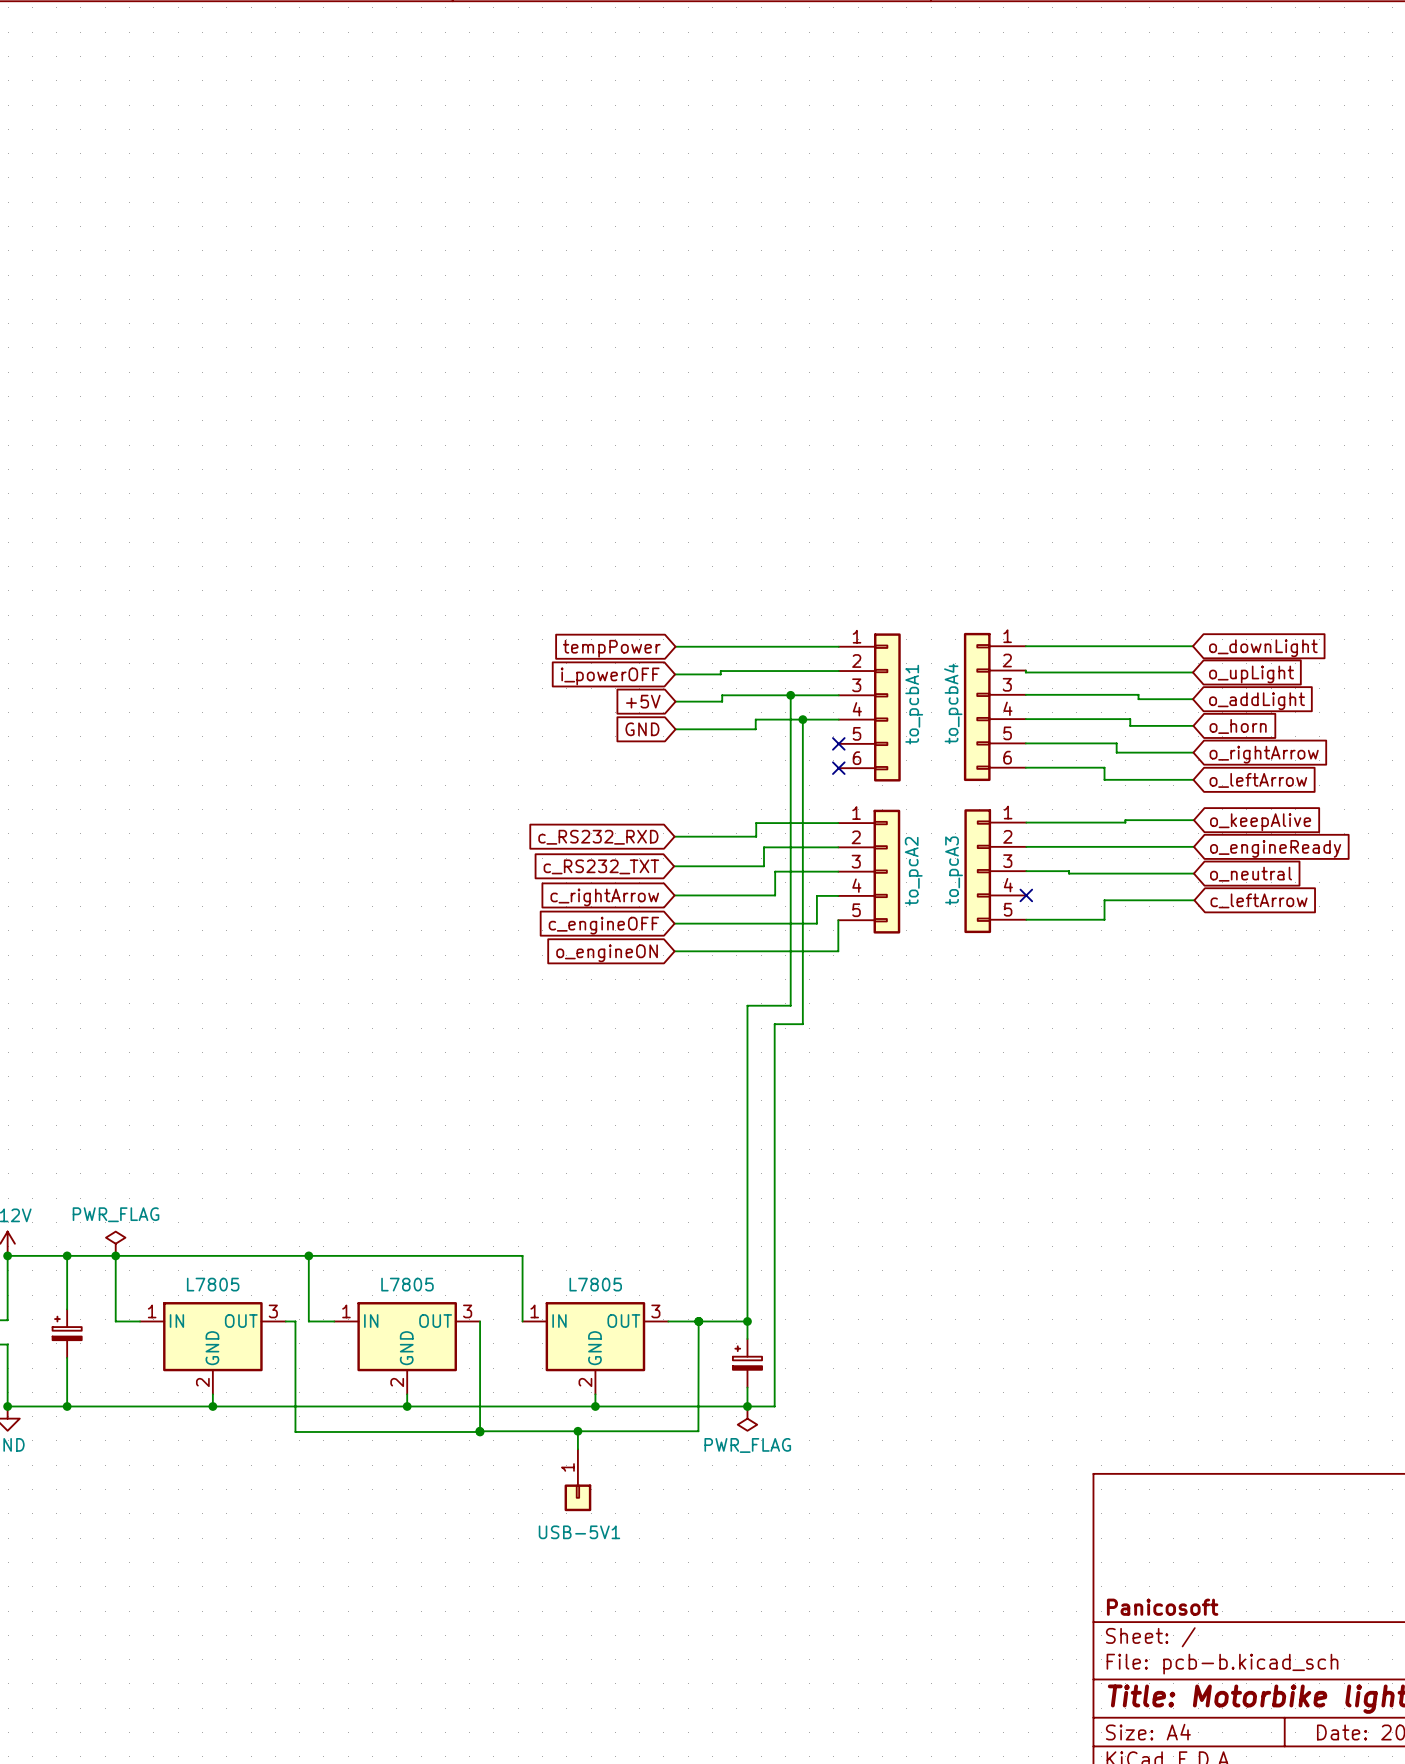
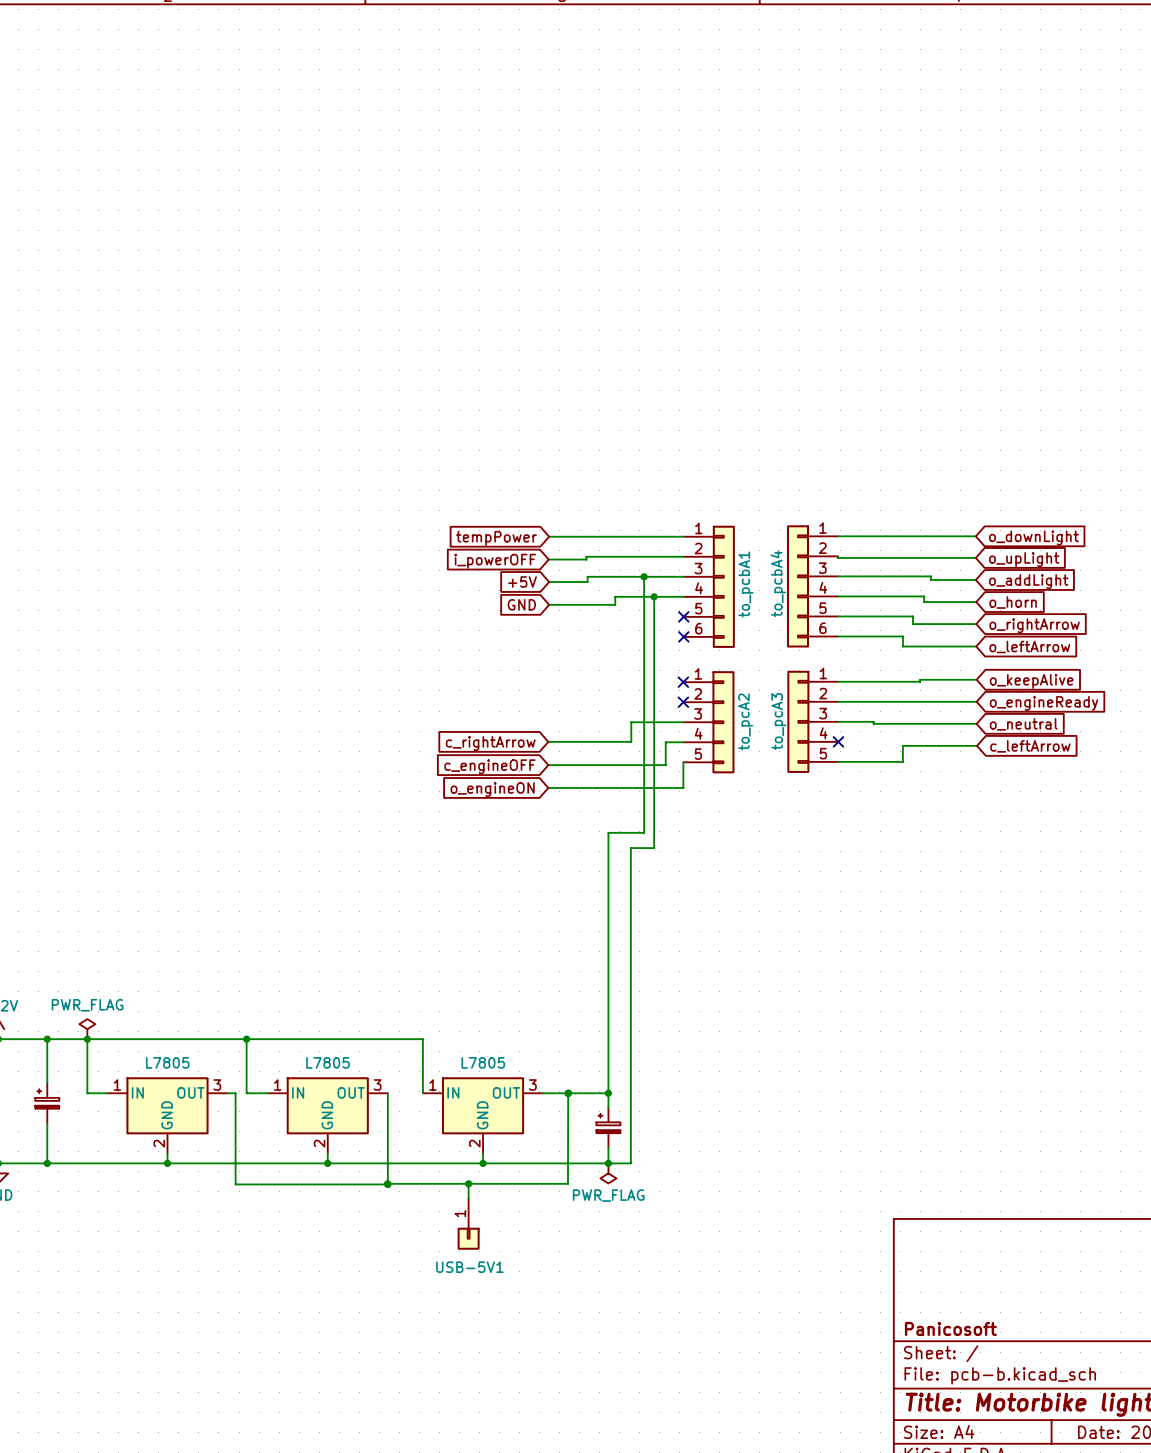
wire: (838, 823) (756, 823) (756, 836) (674, 836) -> none
no-connect mark: none -> (683, 682)
global label: c_RS232_RXD (598, 837) -> none
wire: (838, 847) (763, 847) (763, 866) (674, 866) -> none
no-connect mark: none -> (683, 702)
global label: c_RS232_TXT (601, 866) -> none

